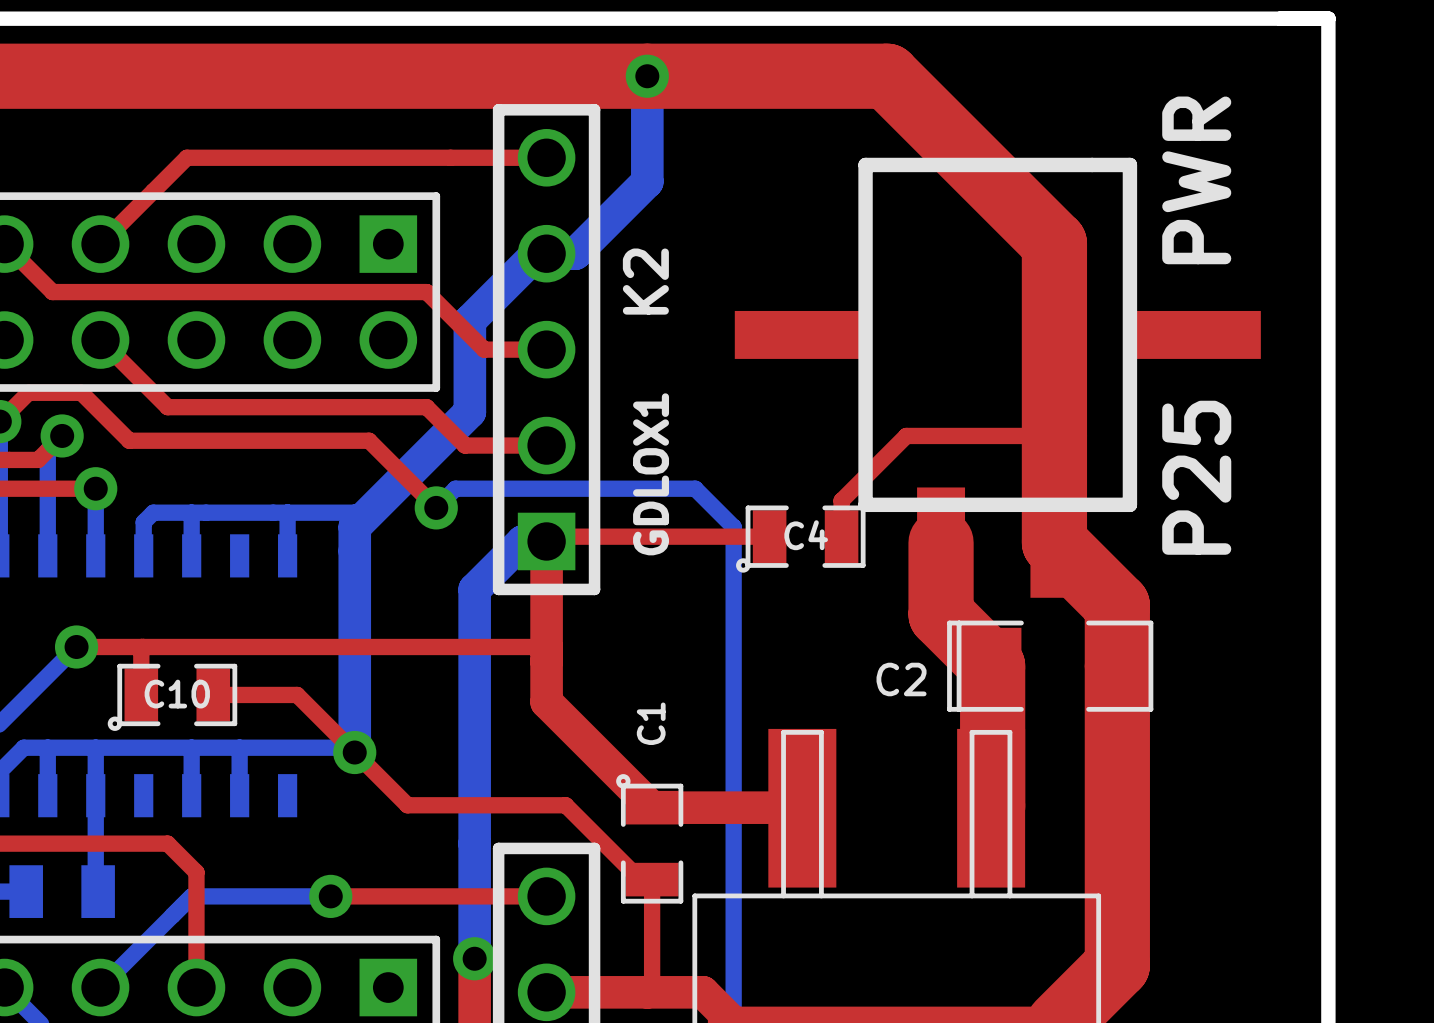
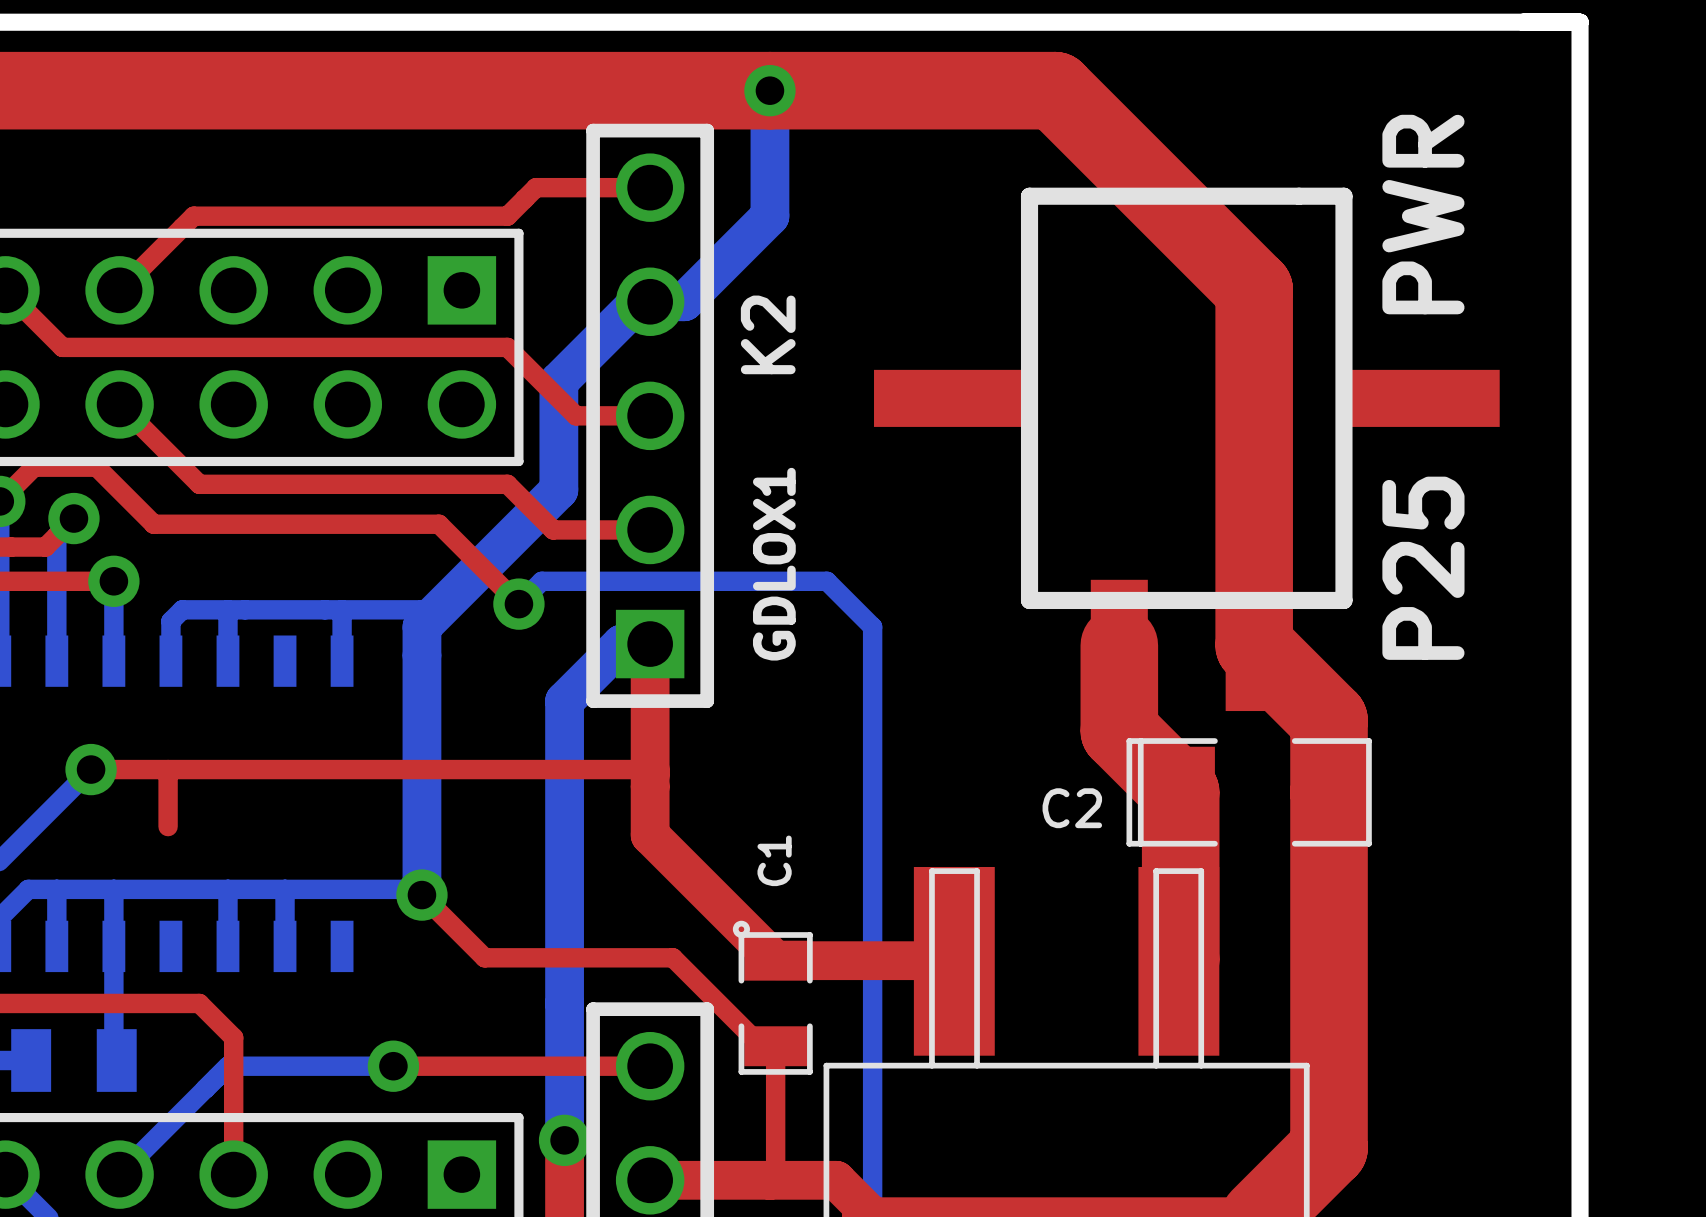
top track: (450, 157) (186, 157) (162, 181) -> (536, 187) (507, 216) (193, 216)
top track: (1054, 435) (906, 435) (841, 500) (841, 536) -> none
top track: (769, 536) (551, 536) (546, 541) -> none
C4: (800, 539) -> none
top track: (213, 694) (297, 694) (354, 752) -> none
C10: (172, 697) -> none

